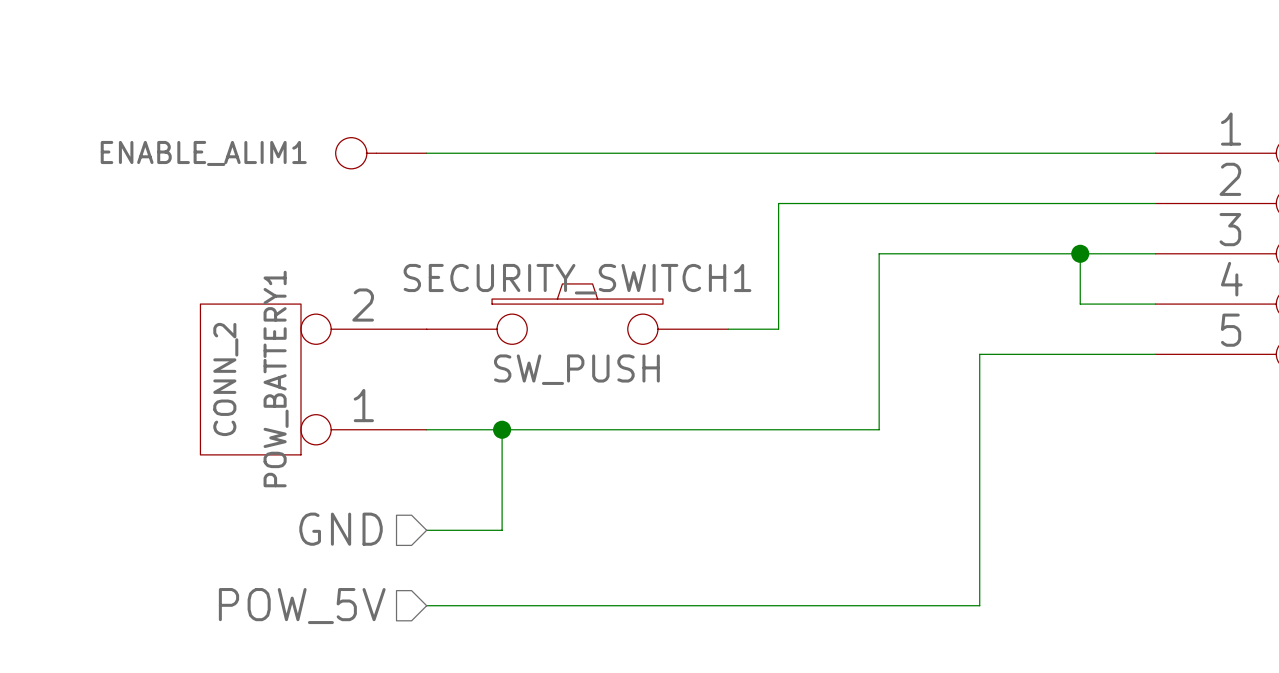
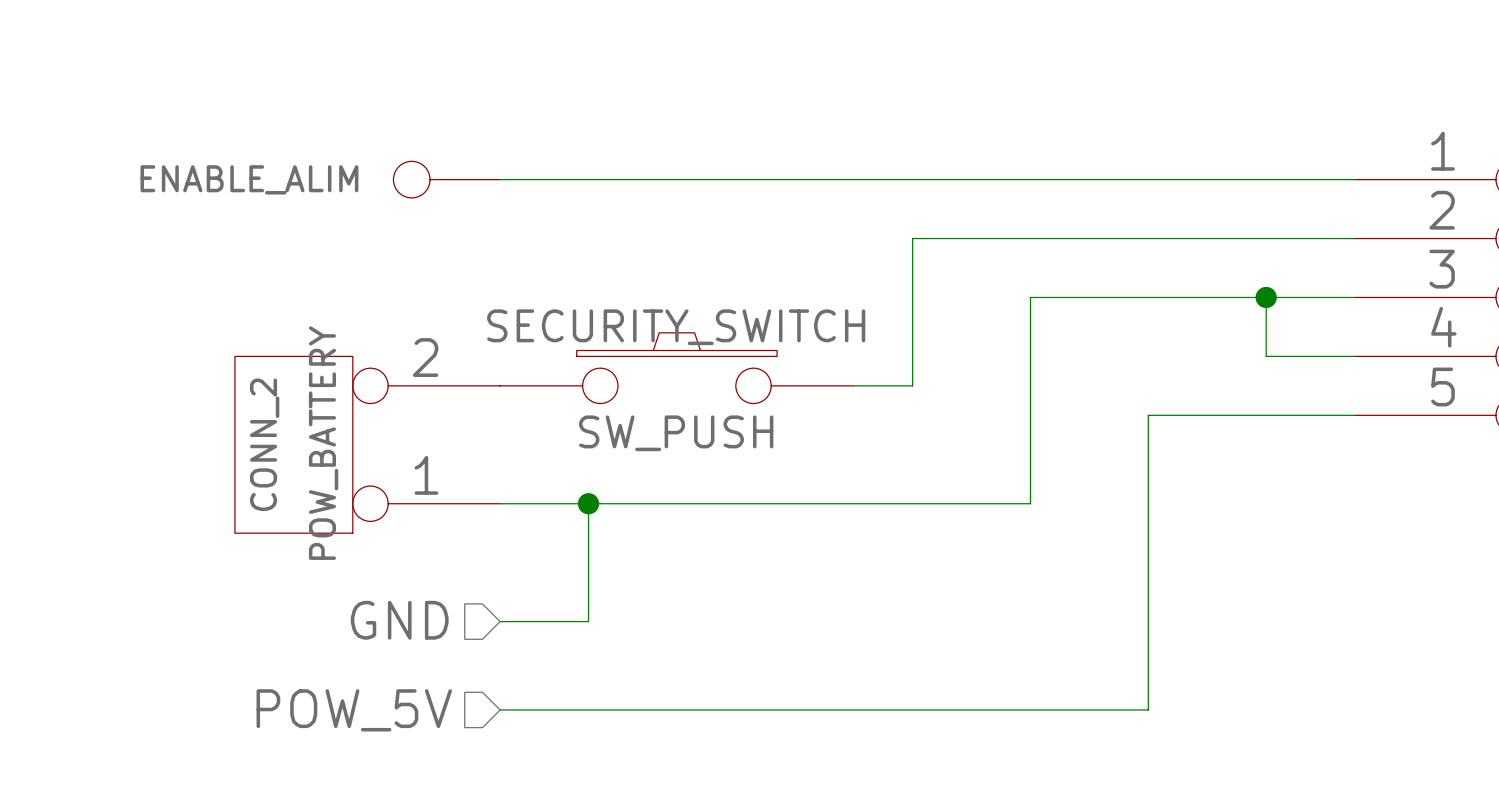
ENABLE_ALIM1 name: ENABLE_ALIM1 (203, 153) -> ENABLE_ALIM (249, 179)
SECURITY_SWITCH1 name: SECURITY_SWITCH1 (577, 279) -> SECURITY_SWITCH (676, 327)
POW_BATTERY1 name: POW_BATTERY1 (276, 379) -> POW_BATTERY (323, 443)

